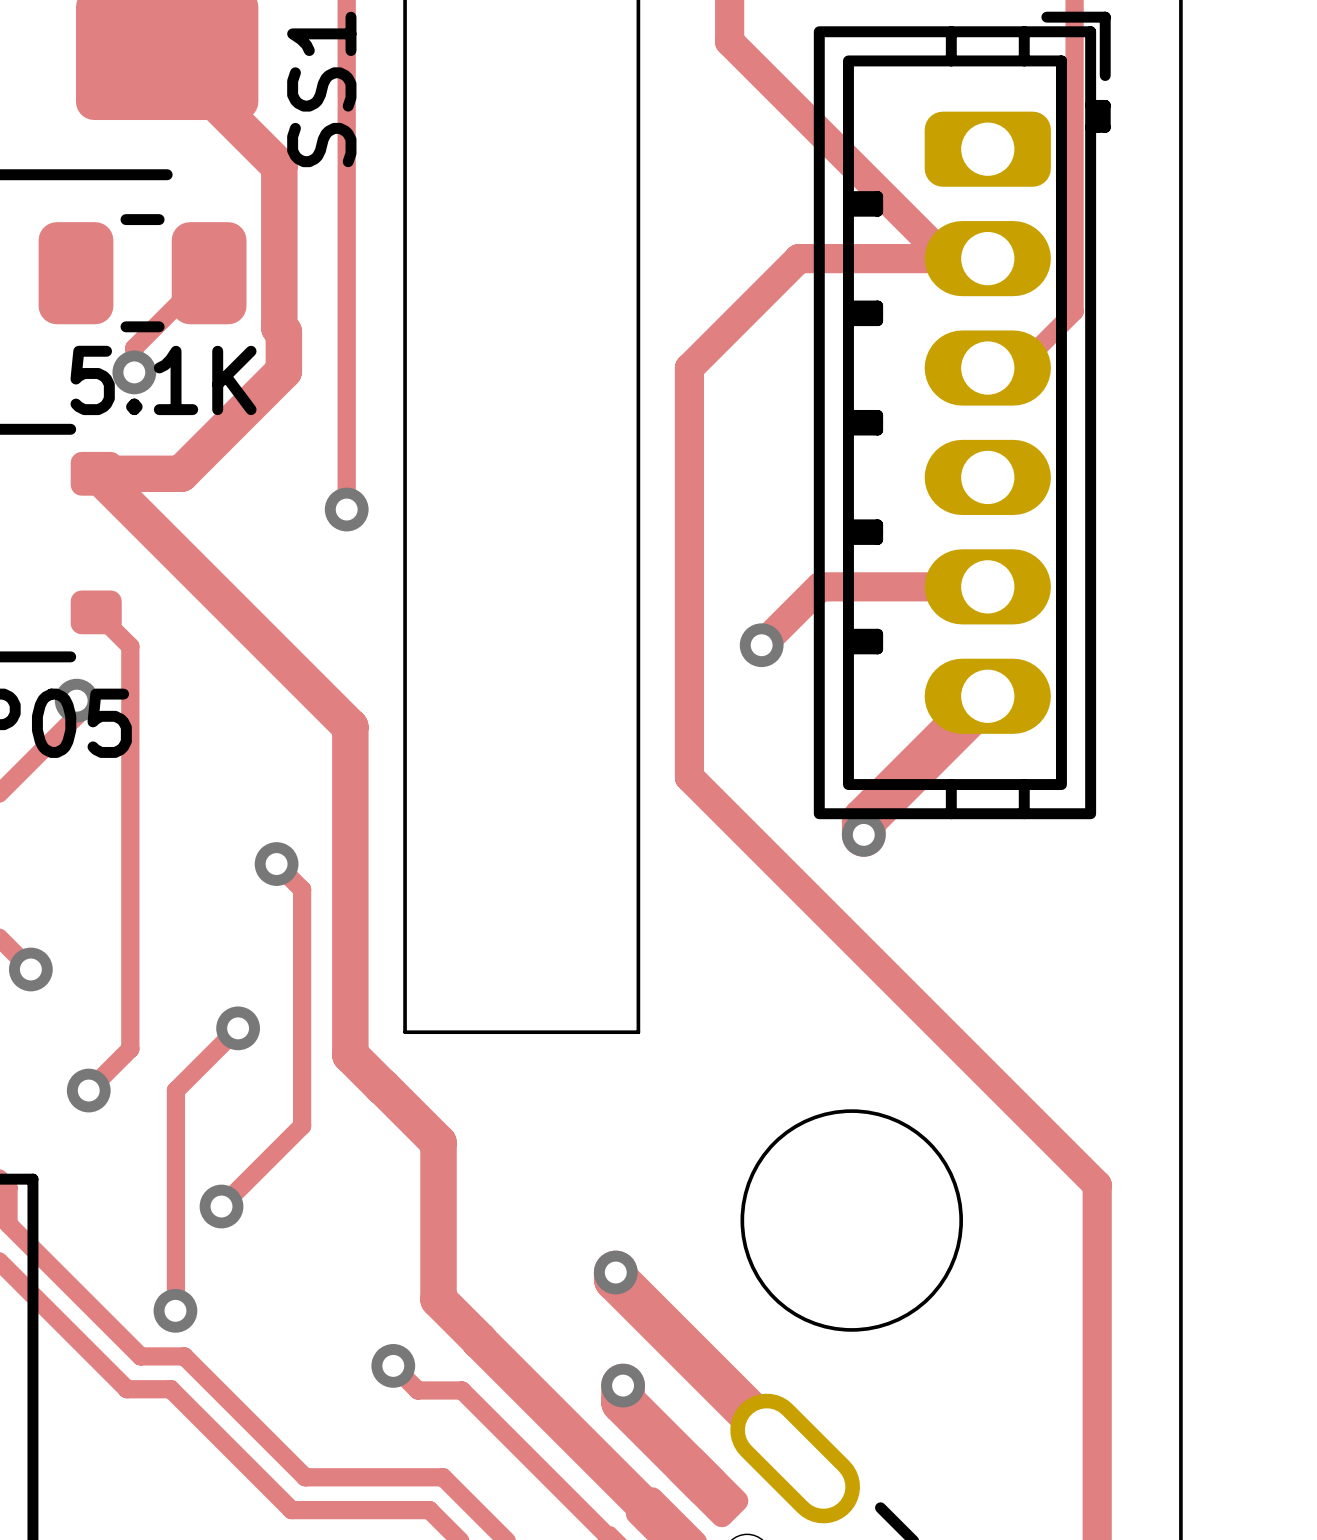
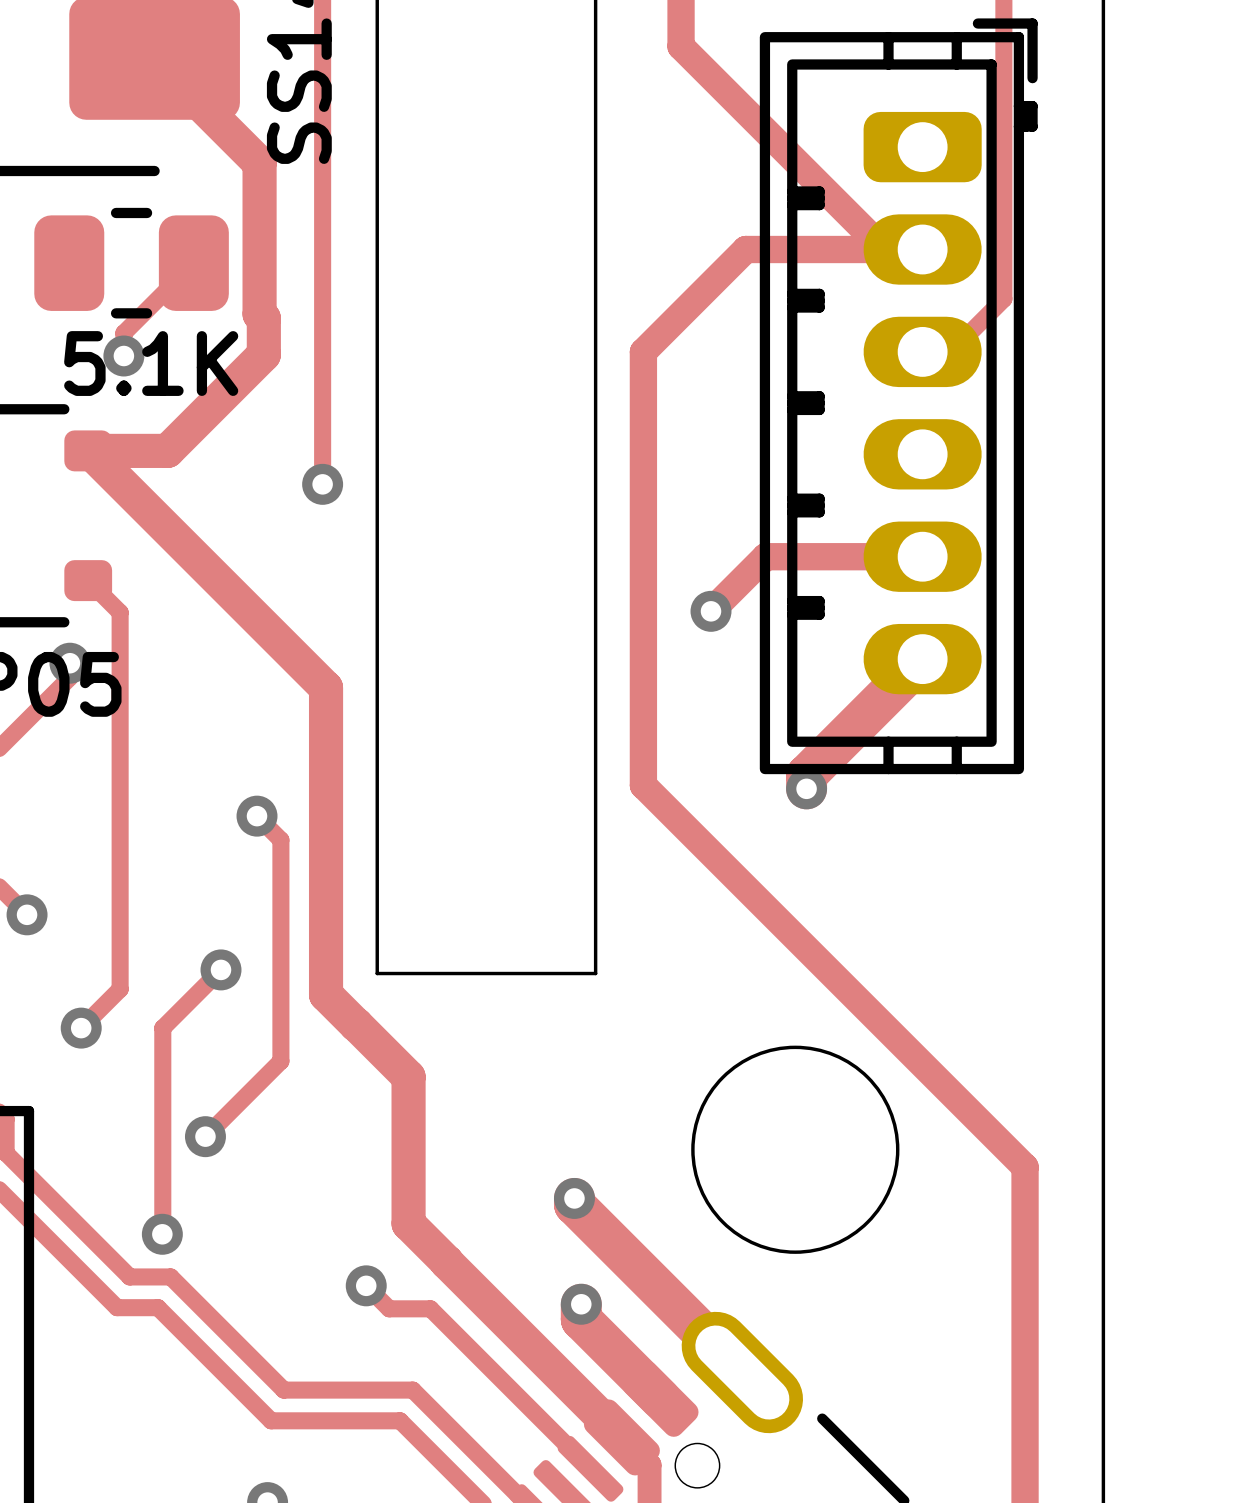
track: (689, 777) (1097, 1185) (1097, 1239) -> (643, 734) (643, 785) (1025, 1167)

